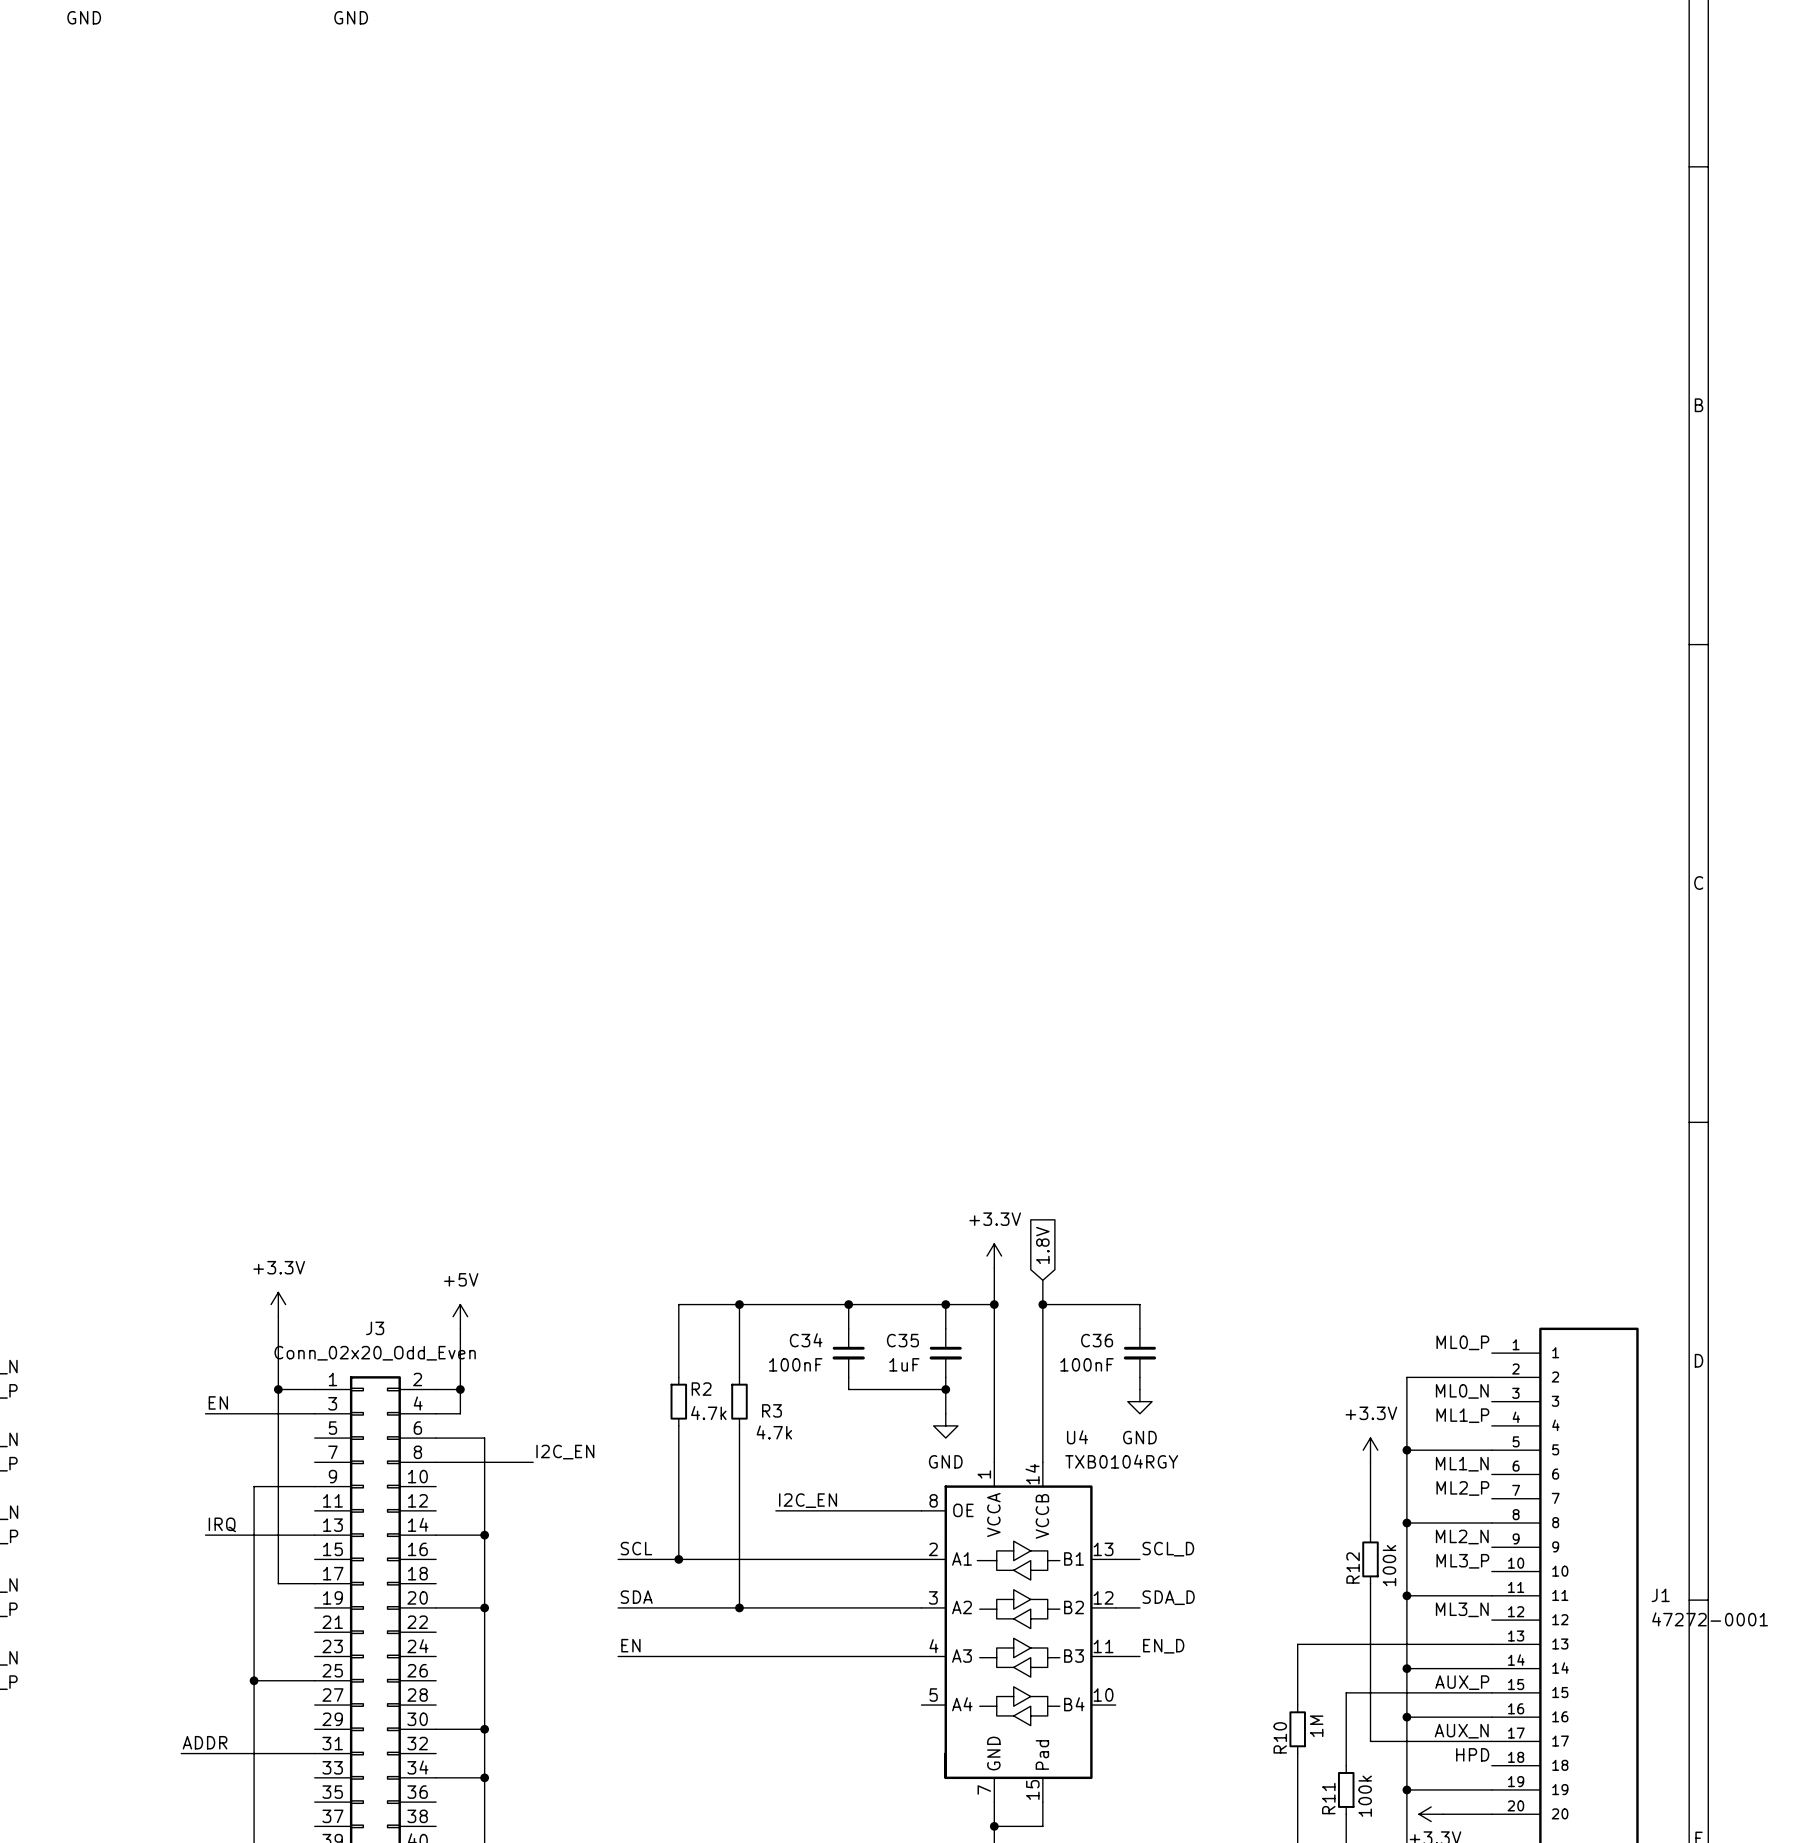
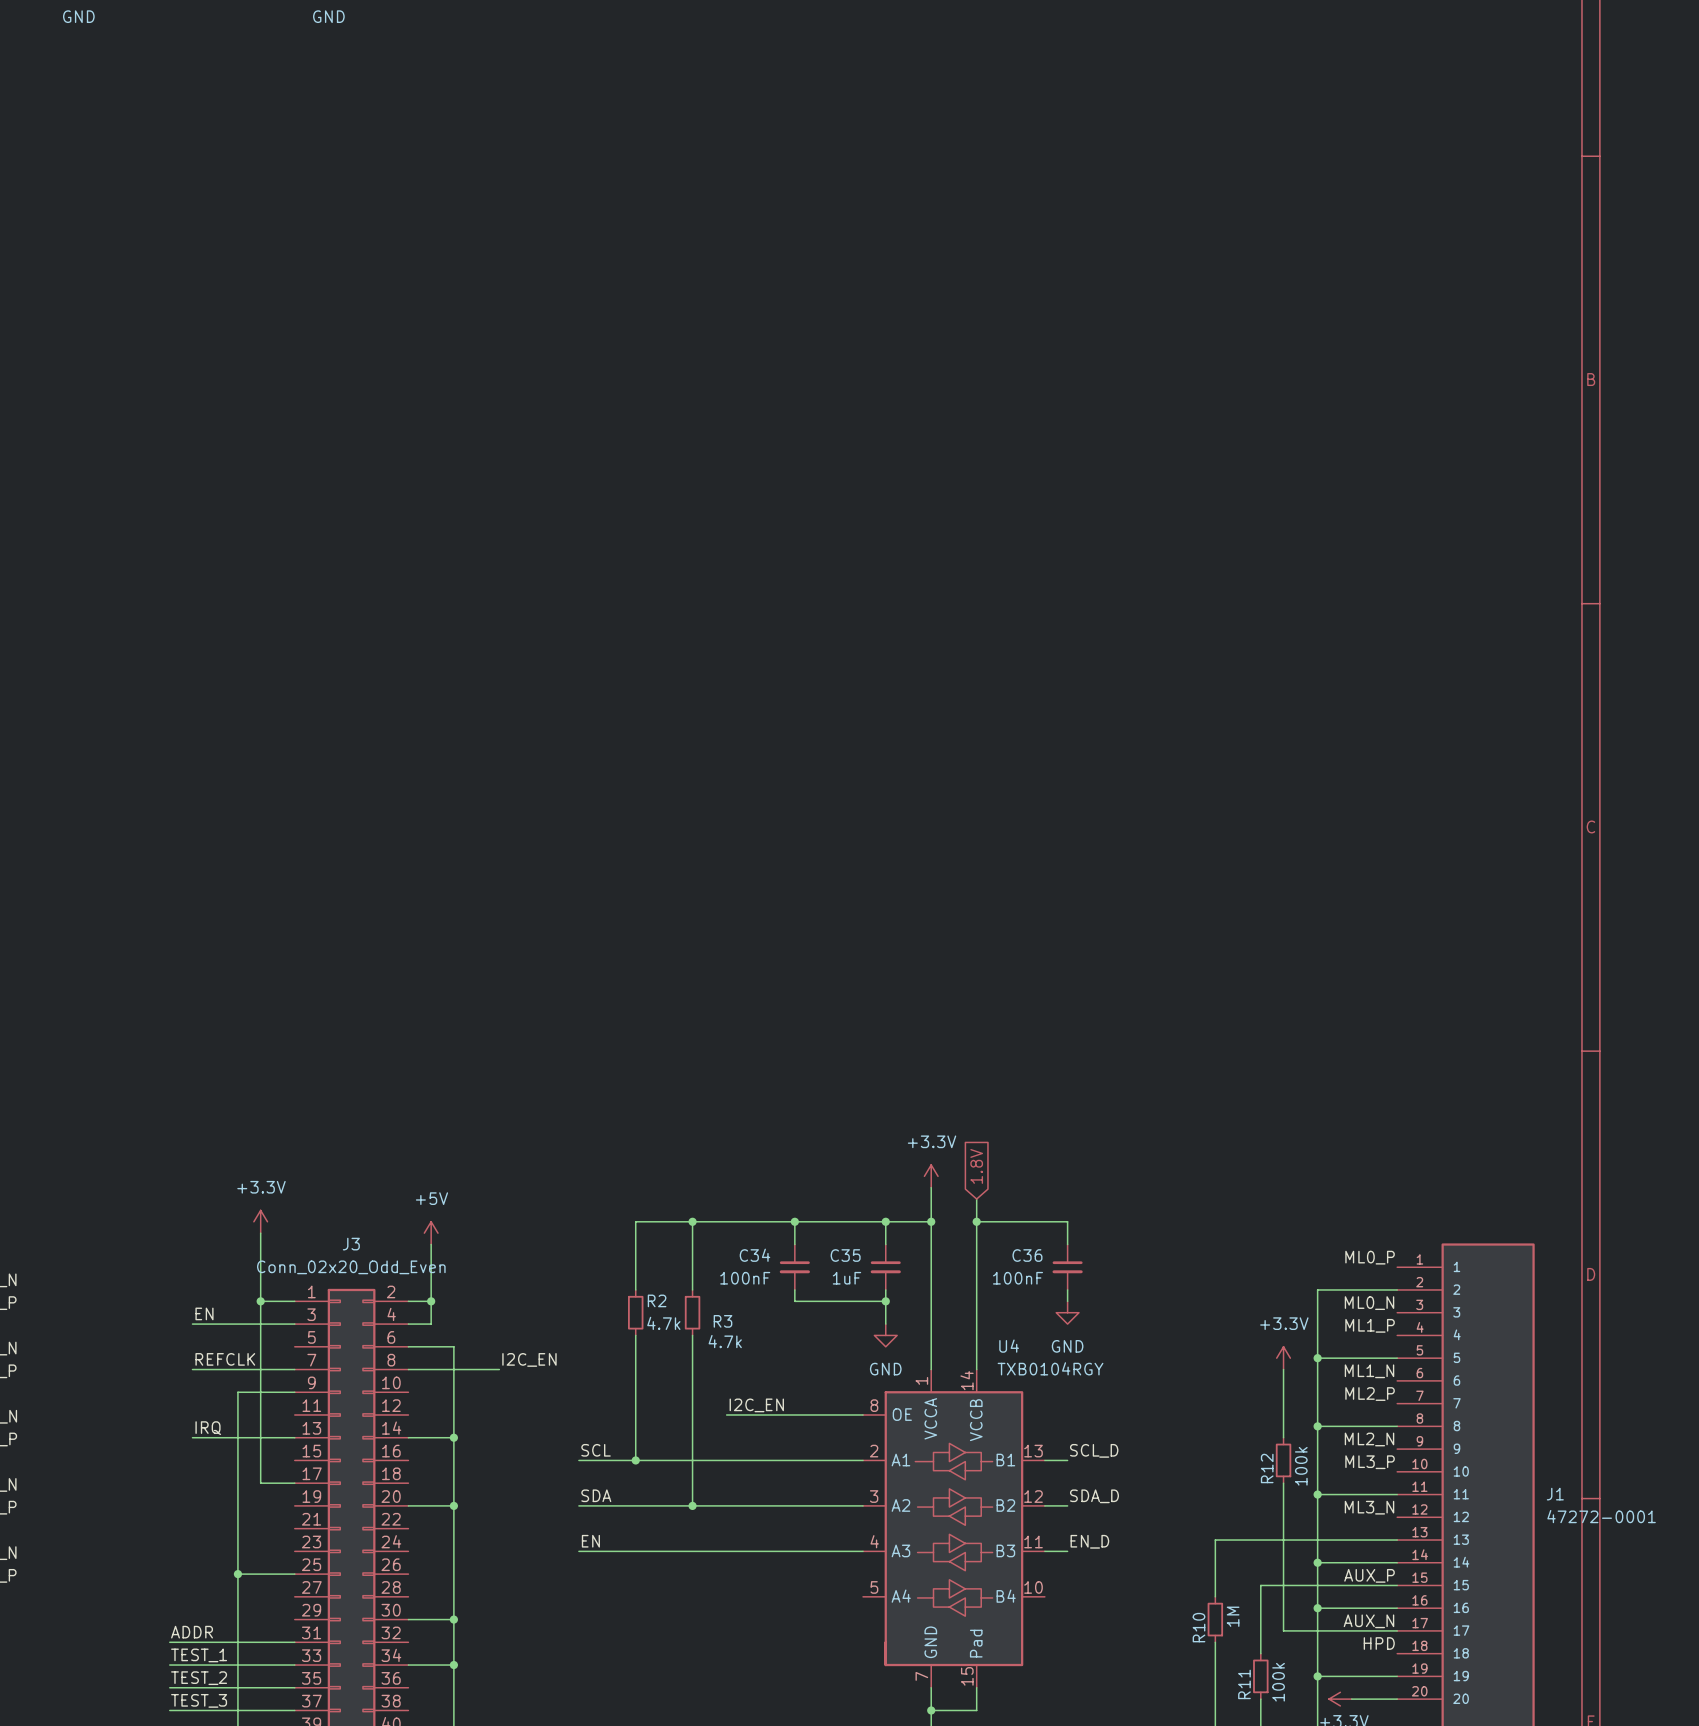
label: none -> REFCLK (225, 1359)
wire: none -> (192, 1369) (294, 1369)
label: none -> TEST_1 (199, 1655)
wire: none -> (169, 1665) (294, 1665)
label: none -> TEST_2 (199, 1678)
wire: none -> (169, 1687) (294, 1687)
label: none -> TEST_3 (199, 1700)
wire: none -> (169, 1710) (294, 1710)

